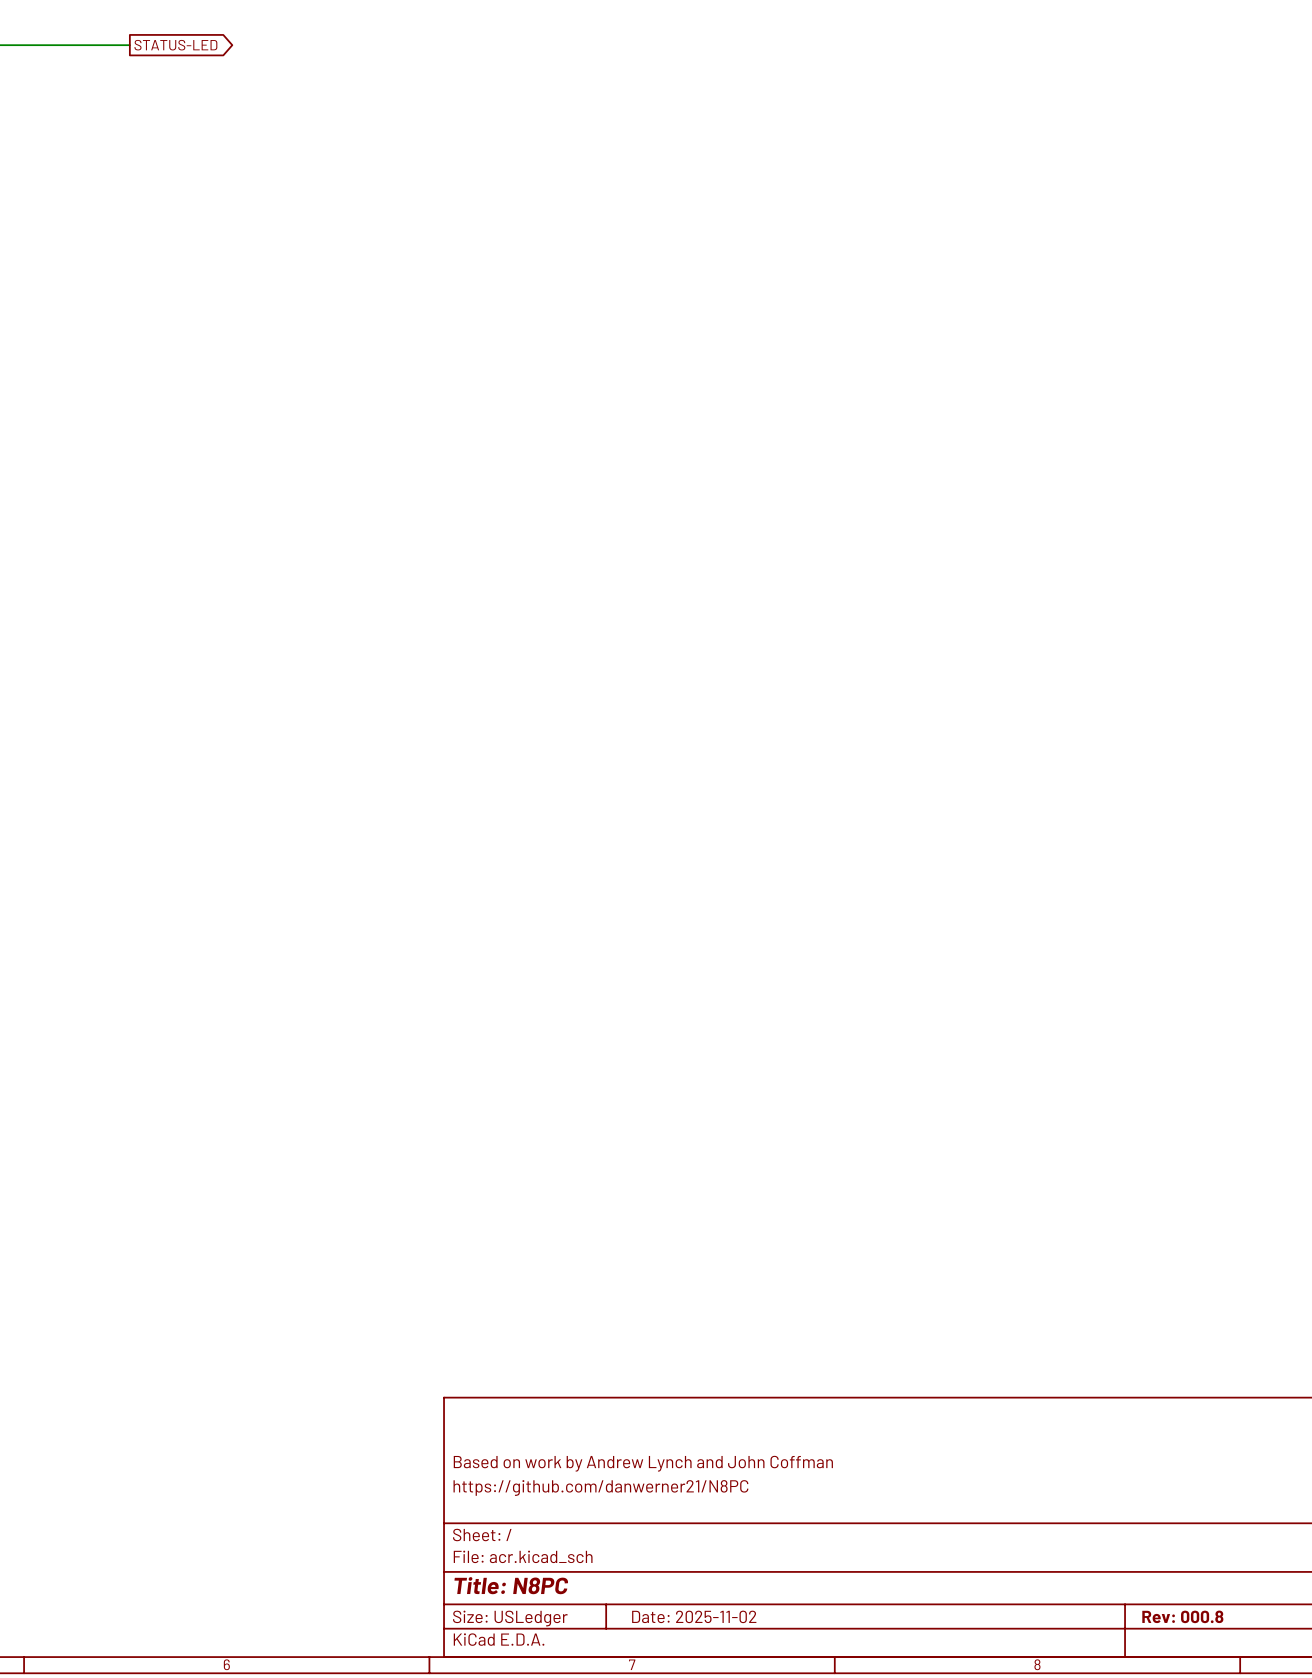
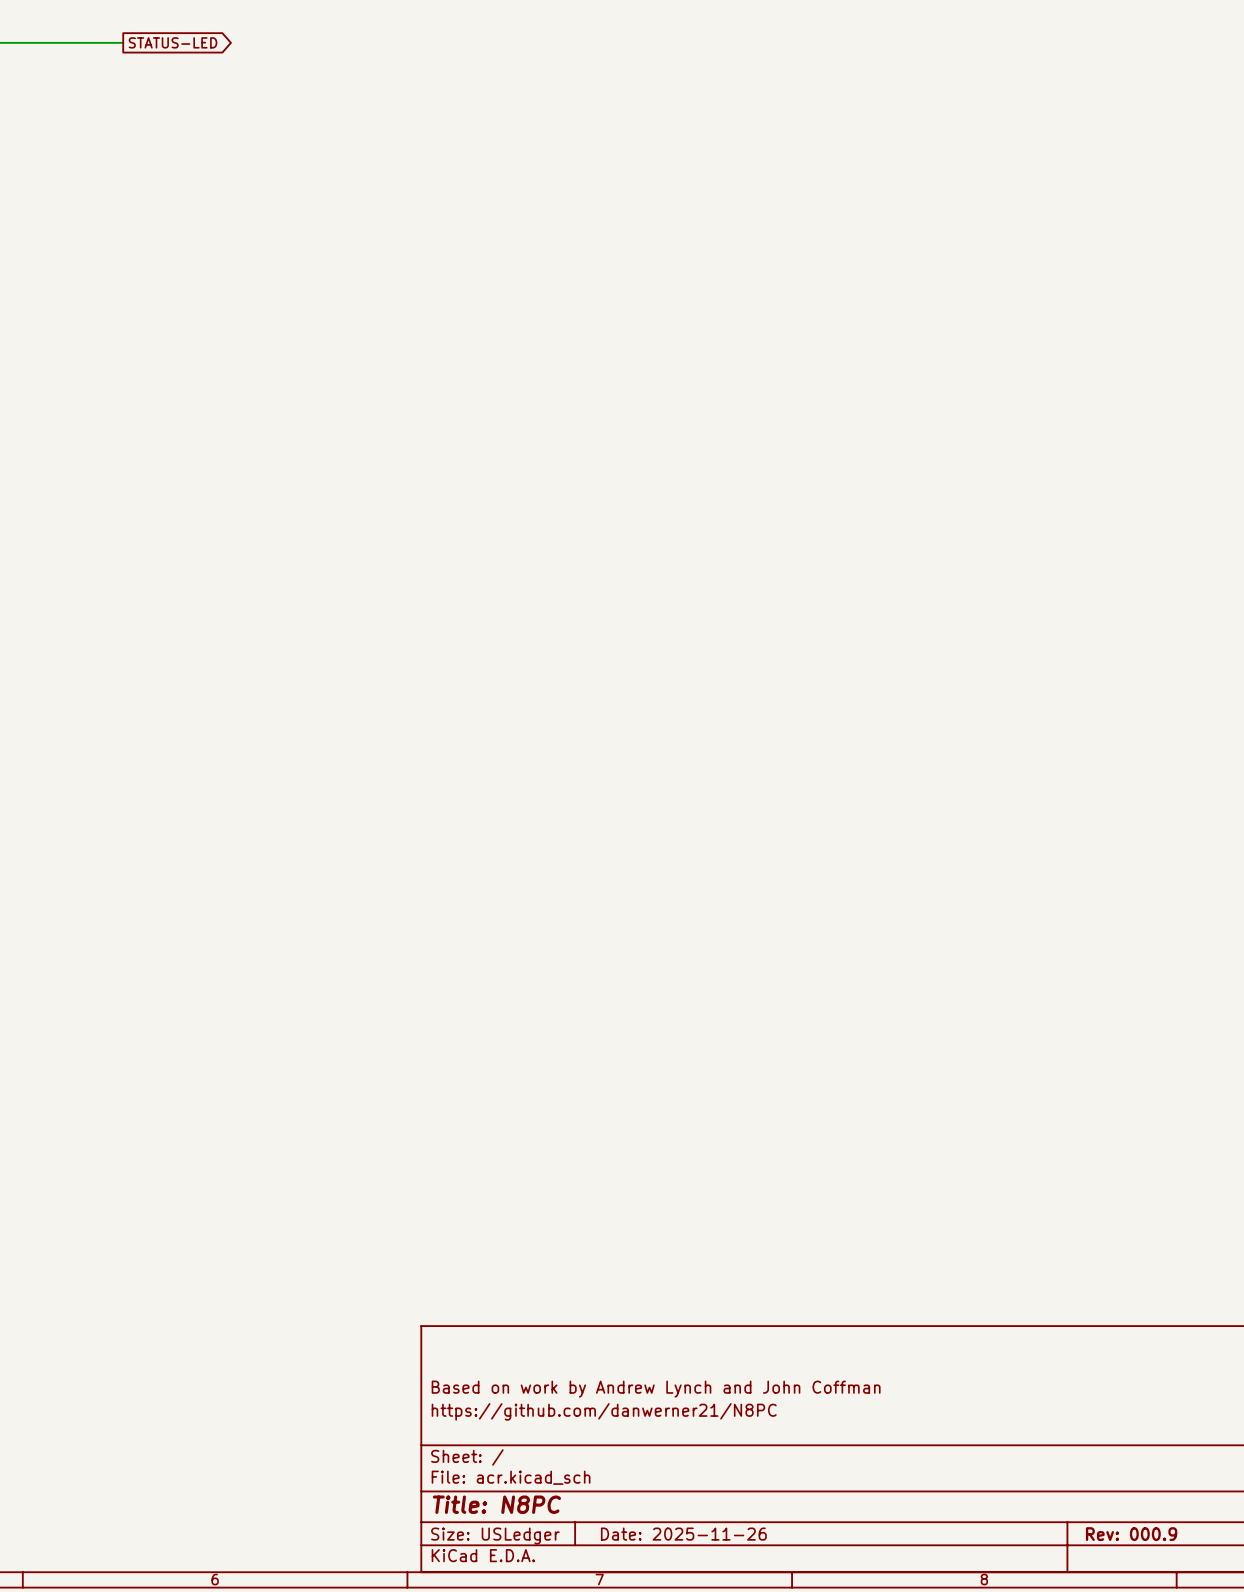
title block: Date: 2025-11-02 (694, 1616) -> Date: 2025-11-26 (683, 1534)
title block: Rev: 000.8 (1182, 1616) -> Rev: 000.9 (1131, 1534)

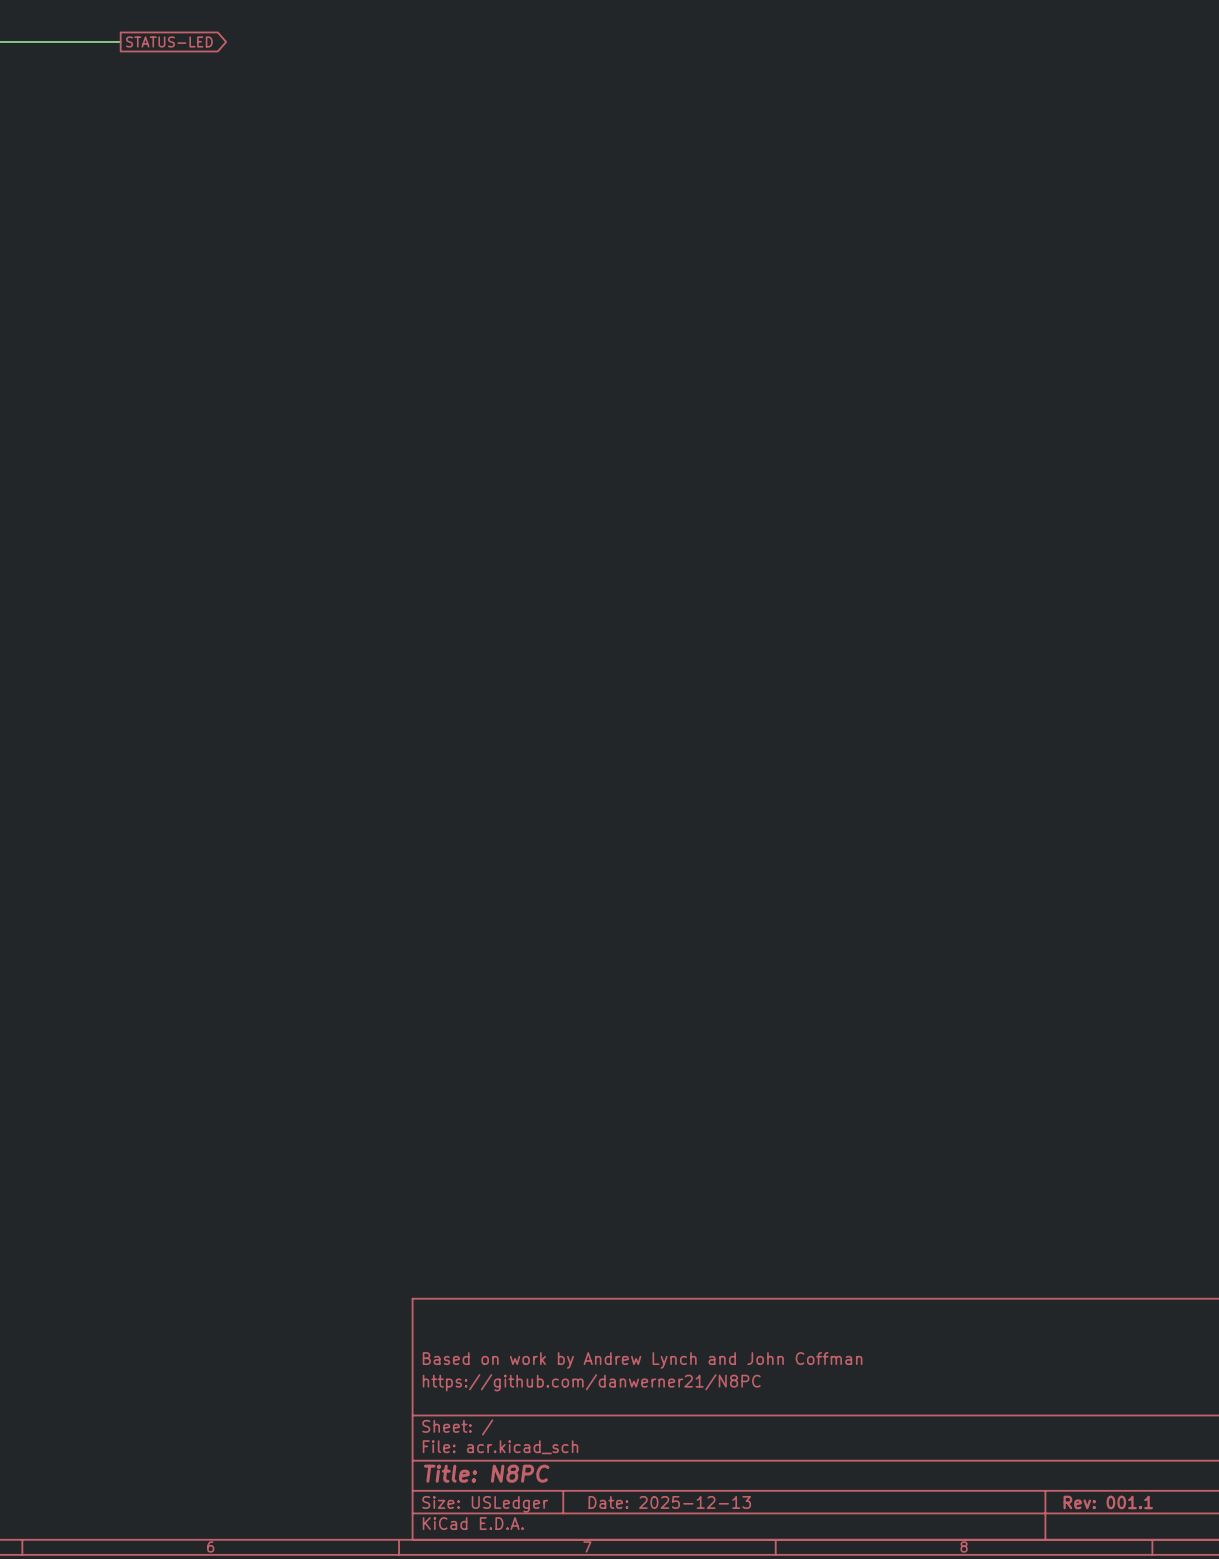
title block: Date: 2025-11-26 (683, 1534) -> Date: 2025-12-13 (669, 1502)
title block: Rev: 000.9 (1131, 1534) -> Rev: 001.1 (1108, 1502)

